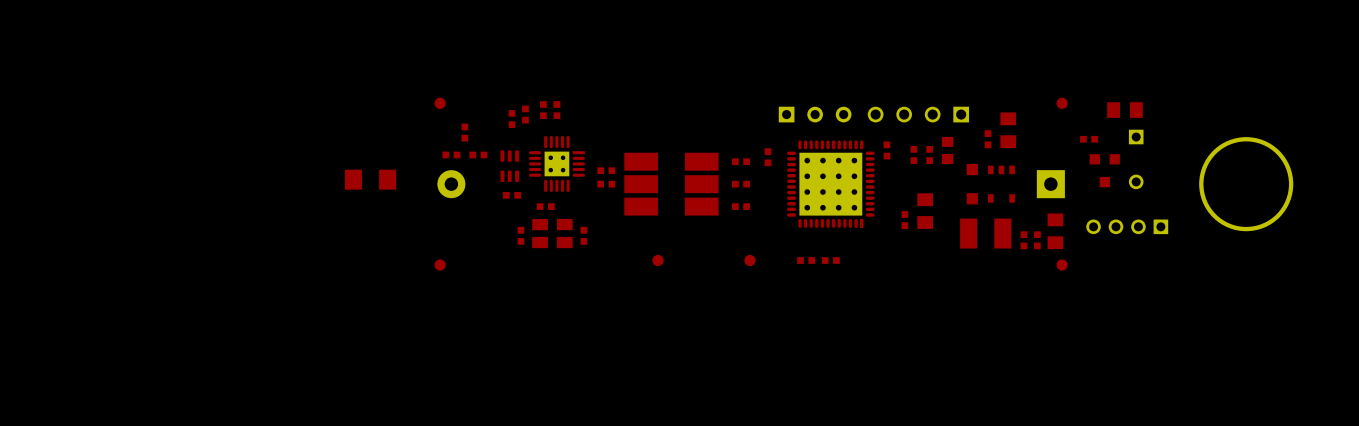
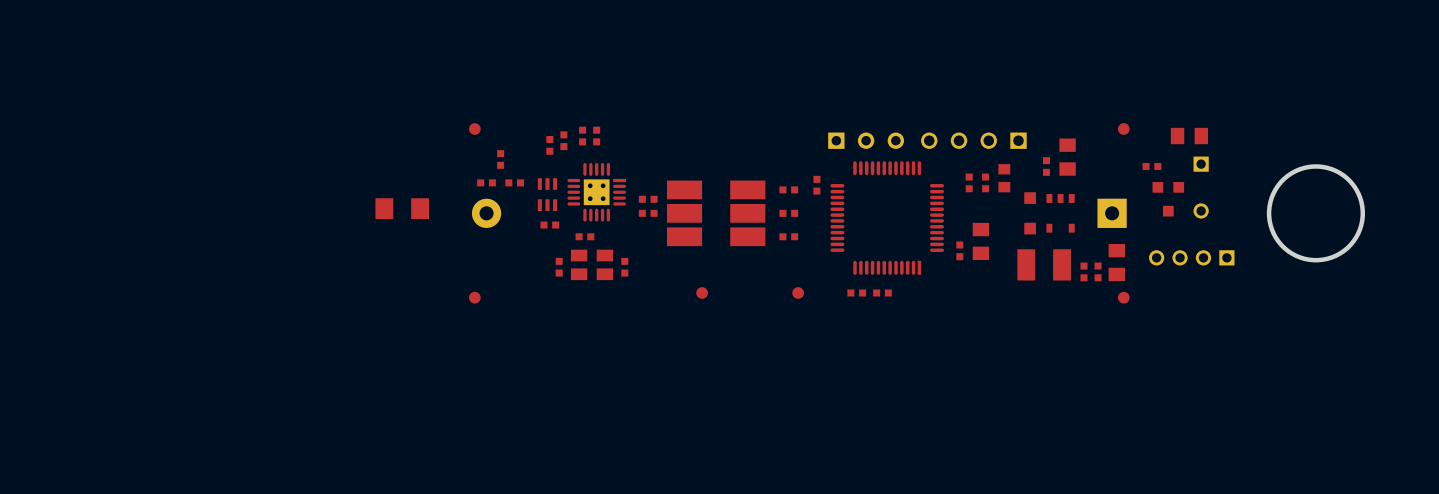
part footprint: [787, 140, 875, 228] -> [830, 161, 944, 275]
part: (886, 150) -> none

